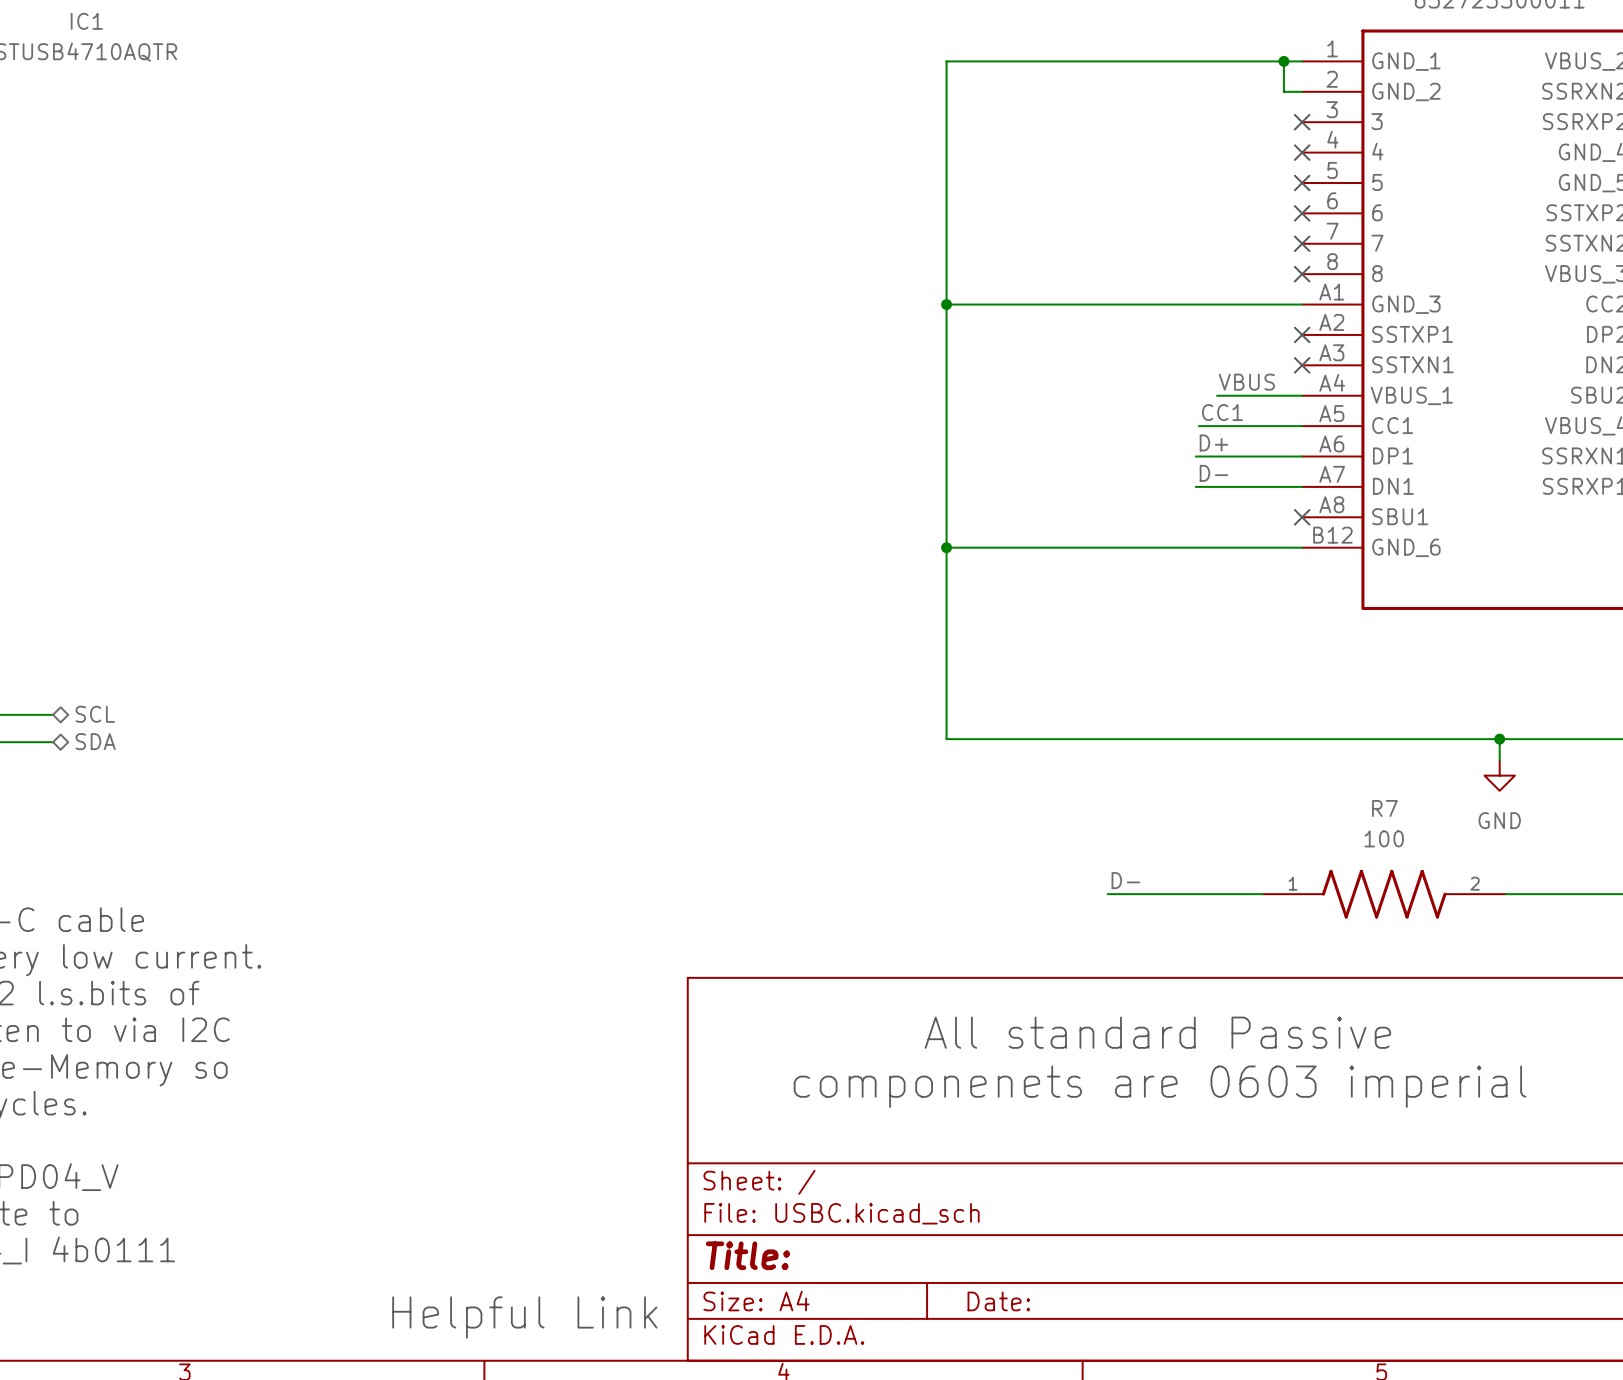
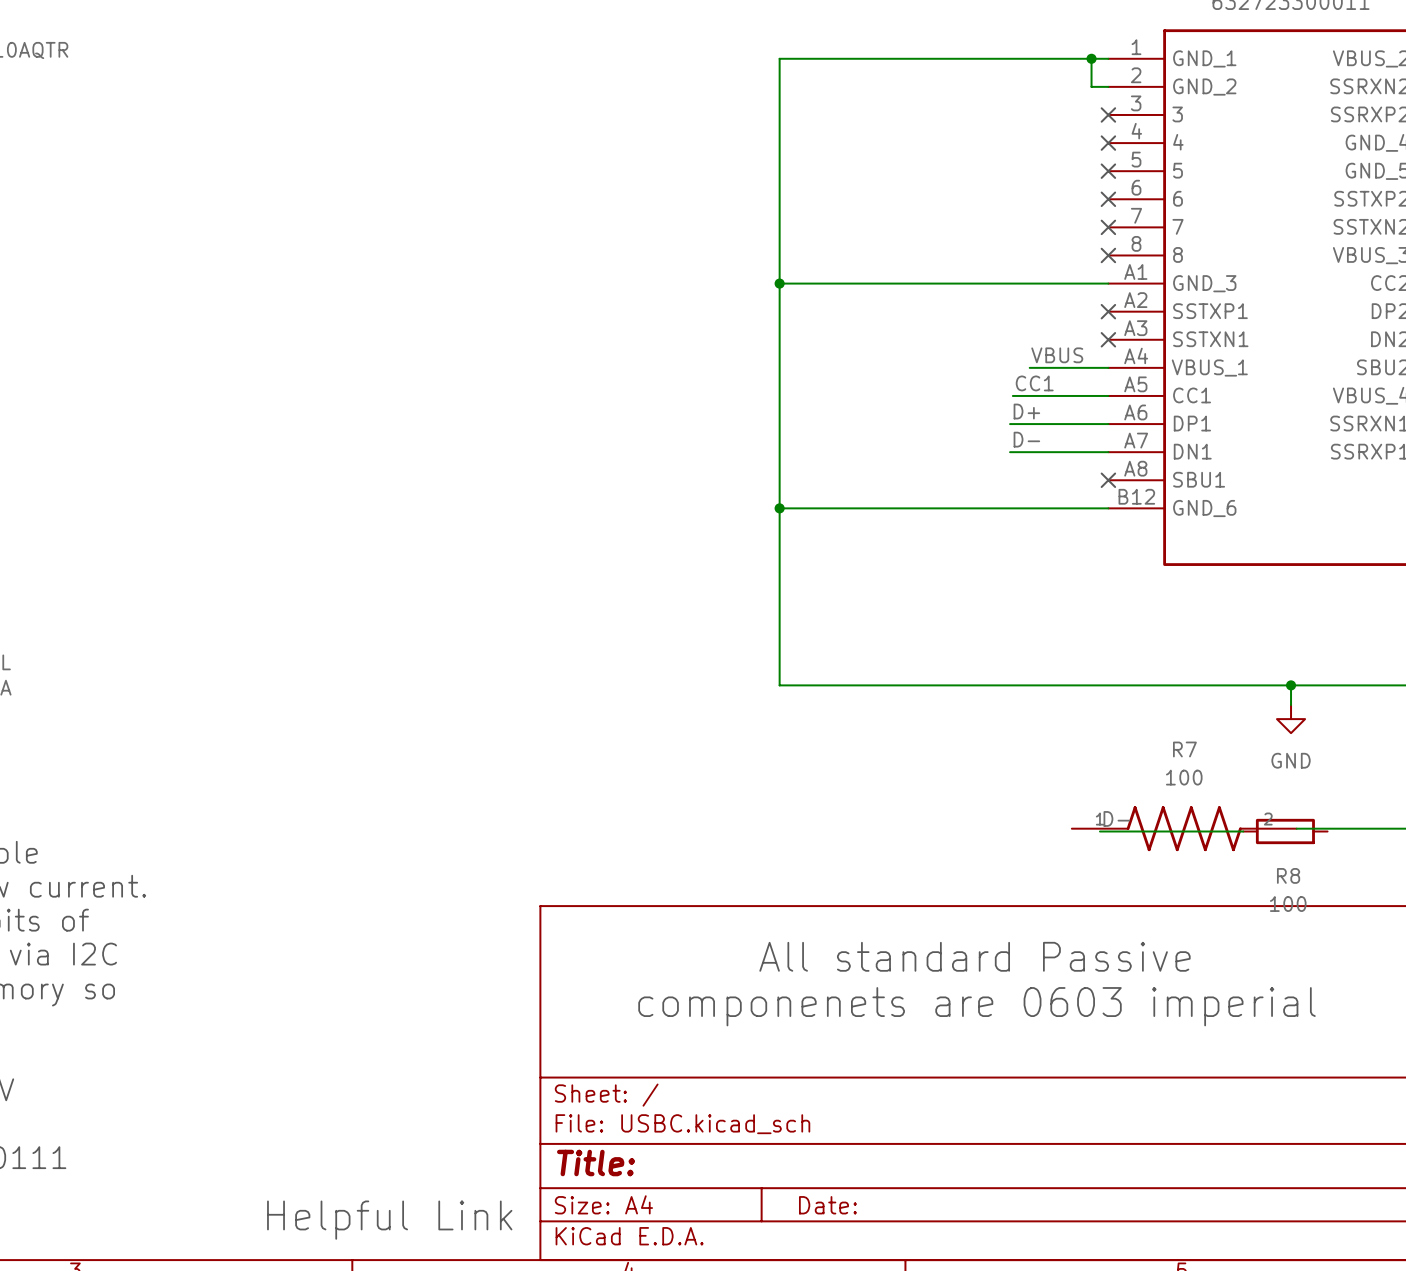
label position: D- (1125, 880) -> D- (1116, 818)
wire: (1107, 894) (1262, 894) -> (1099, 831) (1243, 831)
R8: none -> 100 (1285, 831)

